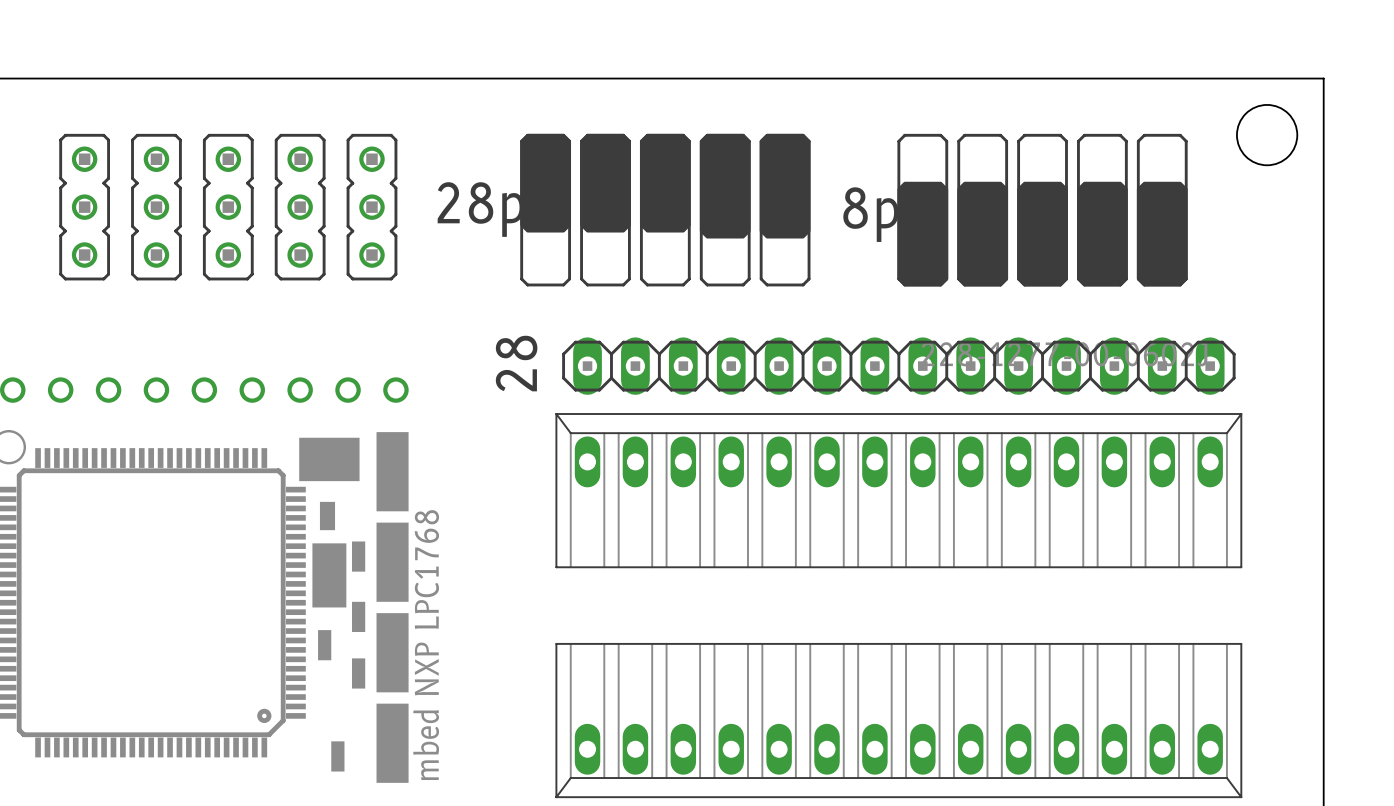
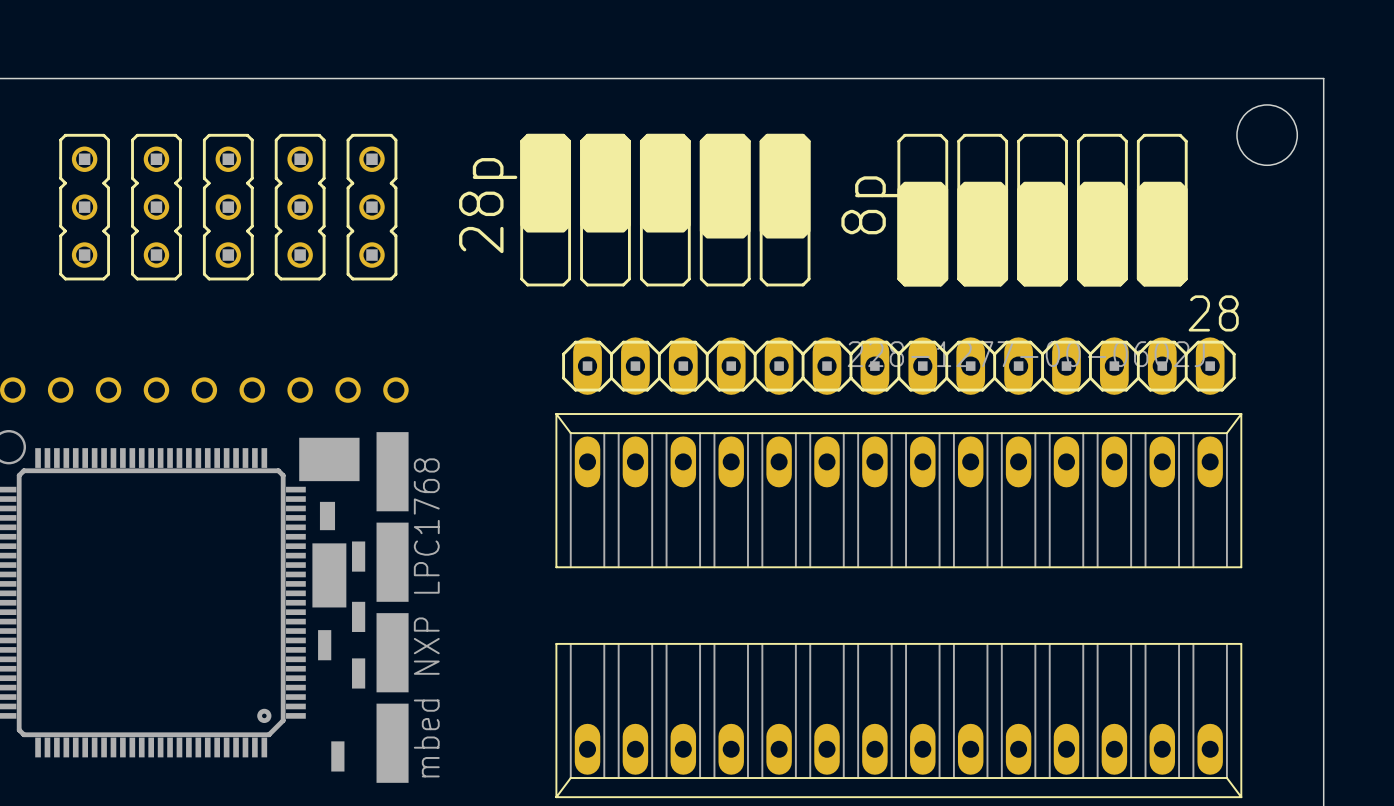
text rotation: 0° (480, 209) -> 90° counterclockwise (488, 205)
text rotation: 0° (871, 214) -> 90° counterclockwise (870, 205)
text: none -> 28 (1213, 313)
text: 28 (516, 363) -> none

